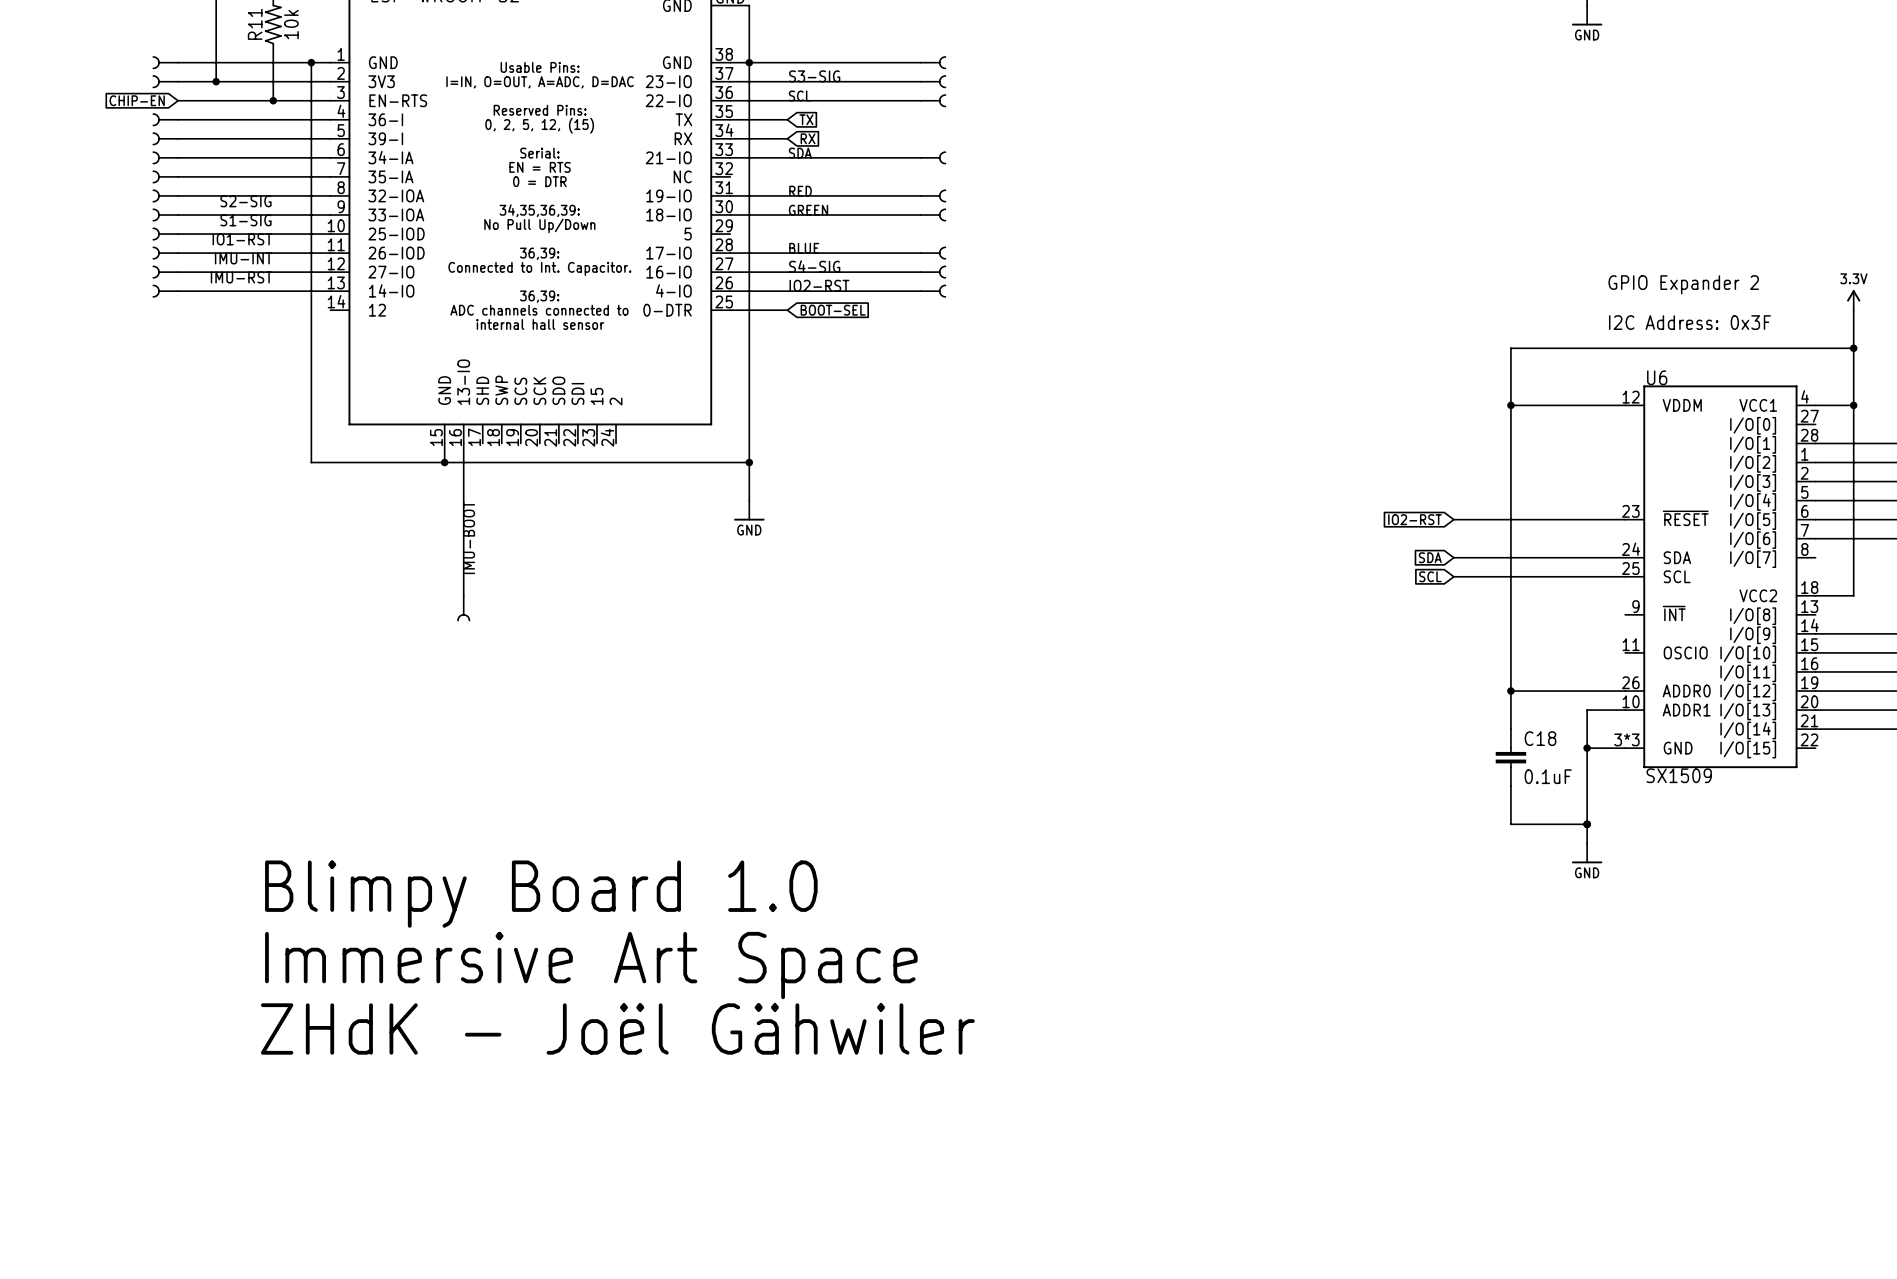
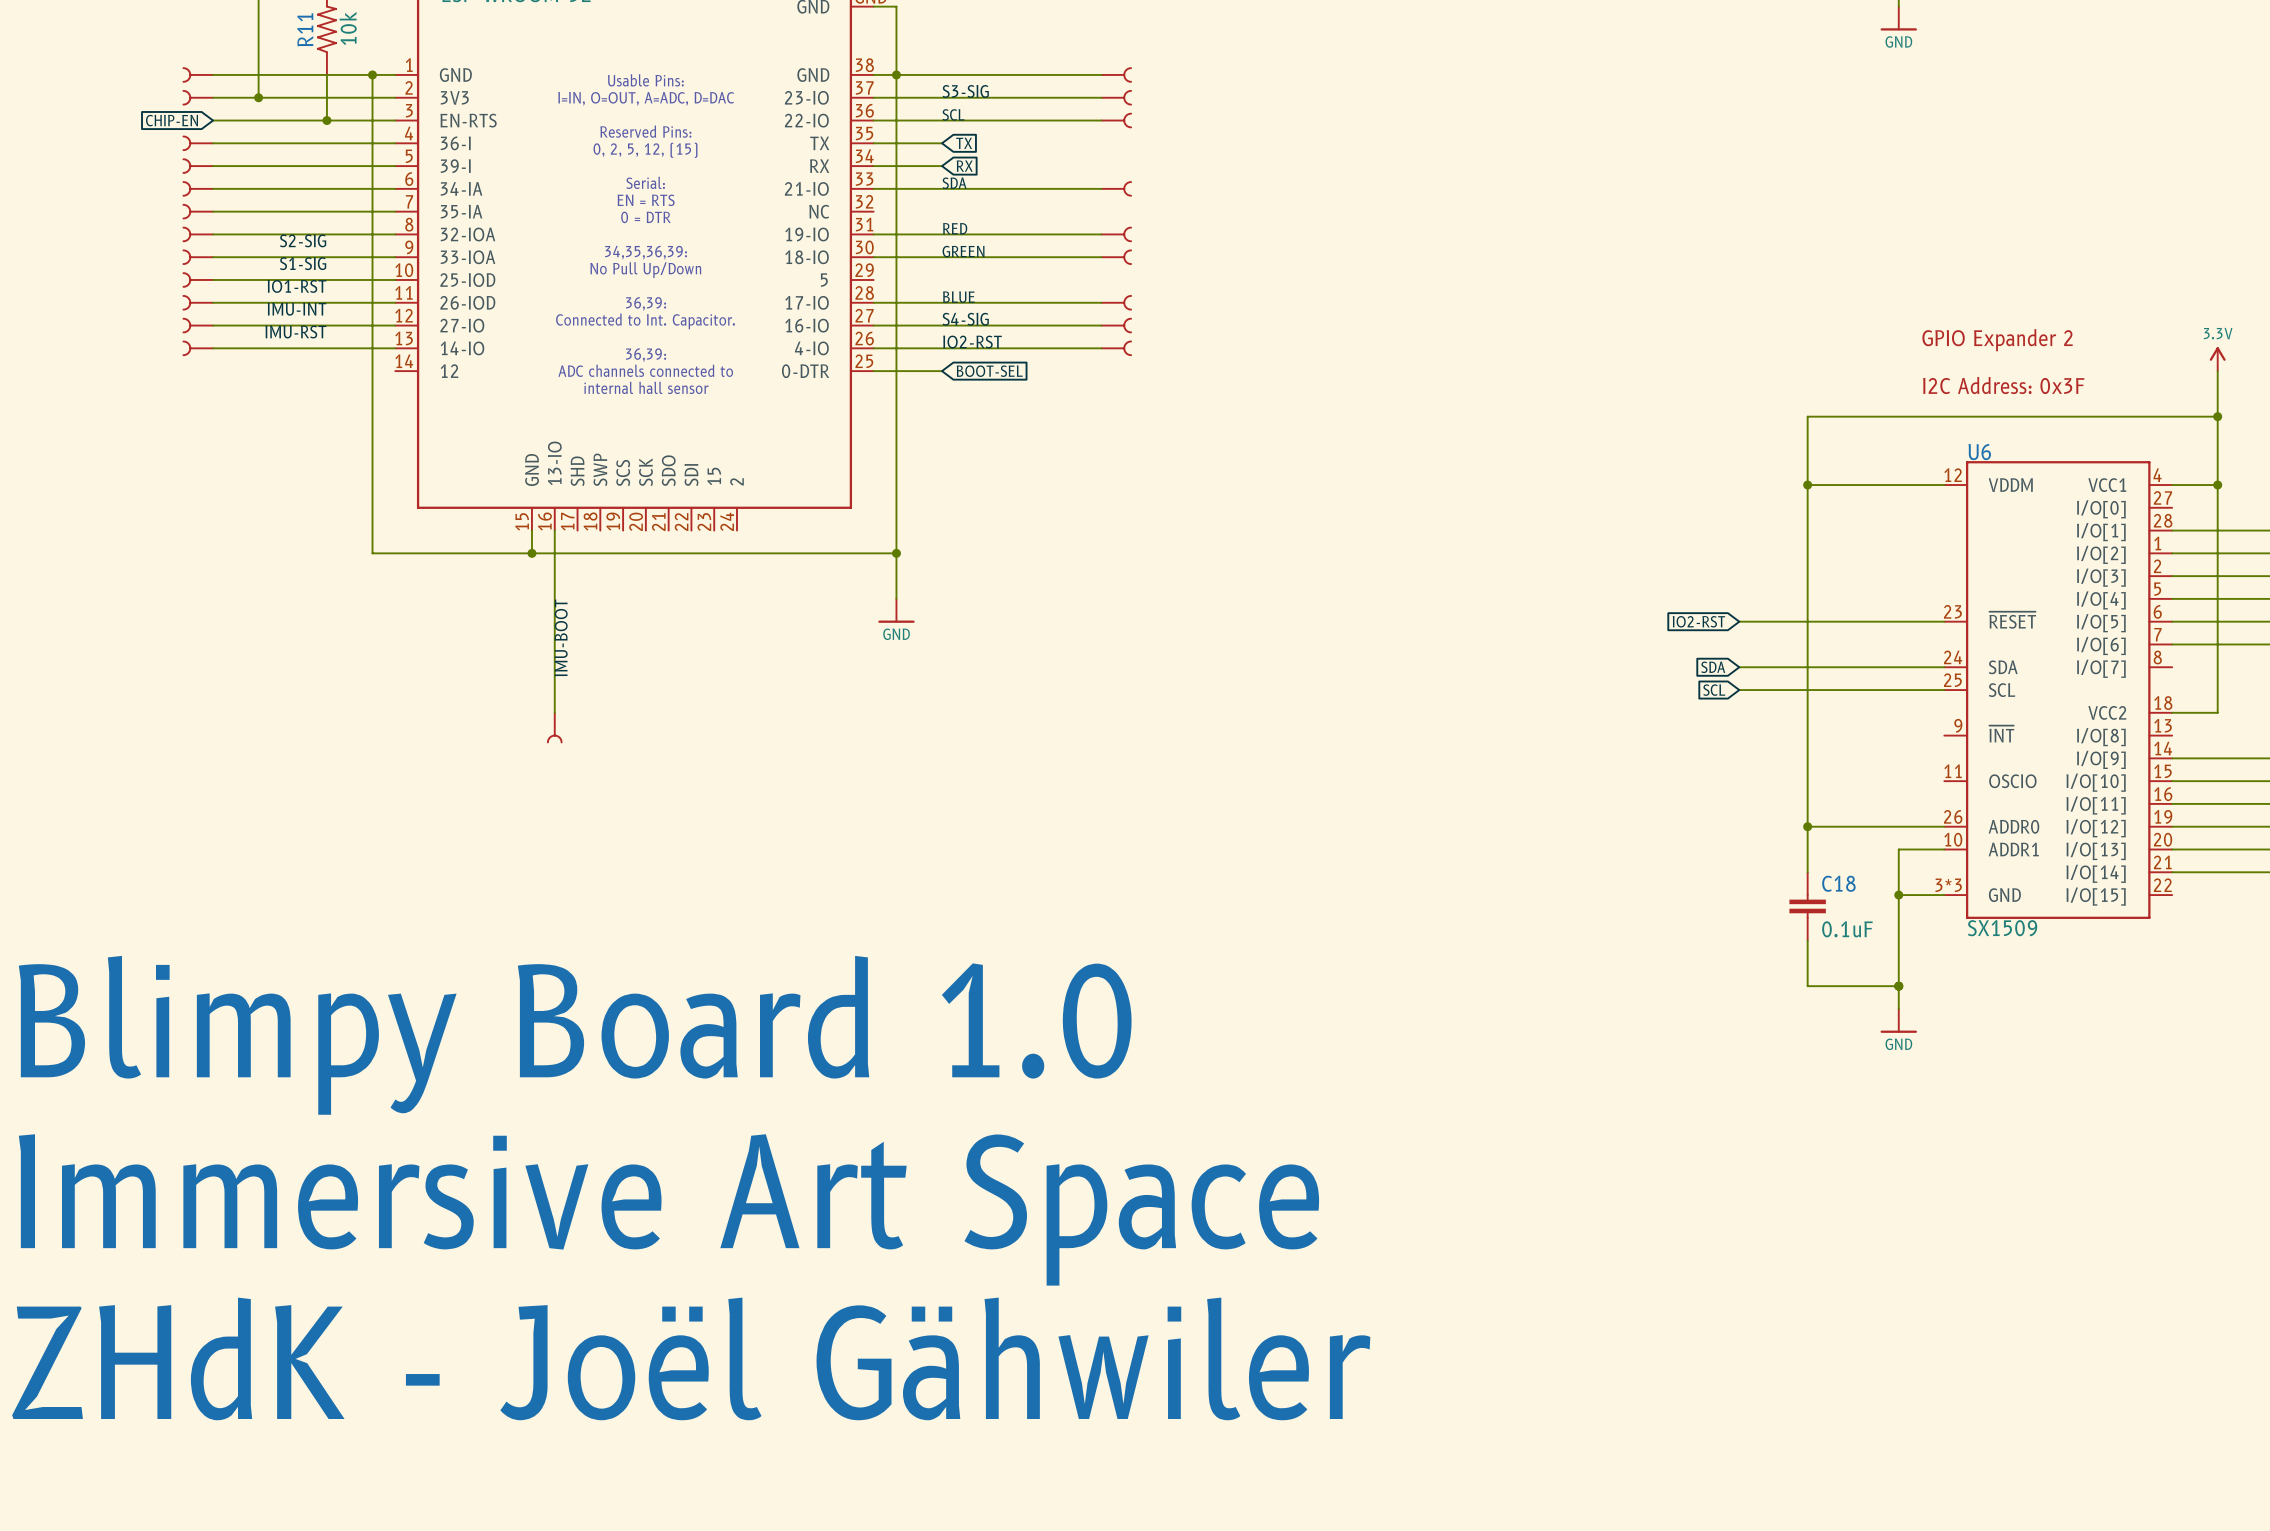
text: none -> Blimpy Board 1.0 (575, 1035)
text: Blimpy Board 1.0 (541, 894) -> none
text: Immersive Art Space (591, 965) -> none
text: none -> Immersive Art Space (668, 1209)
text: ZHdK - Joël Gähwiler (617, 1028) -> none
text: none -> ZHdK - Joël Gähwiler (691, 1358)

